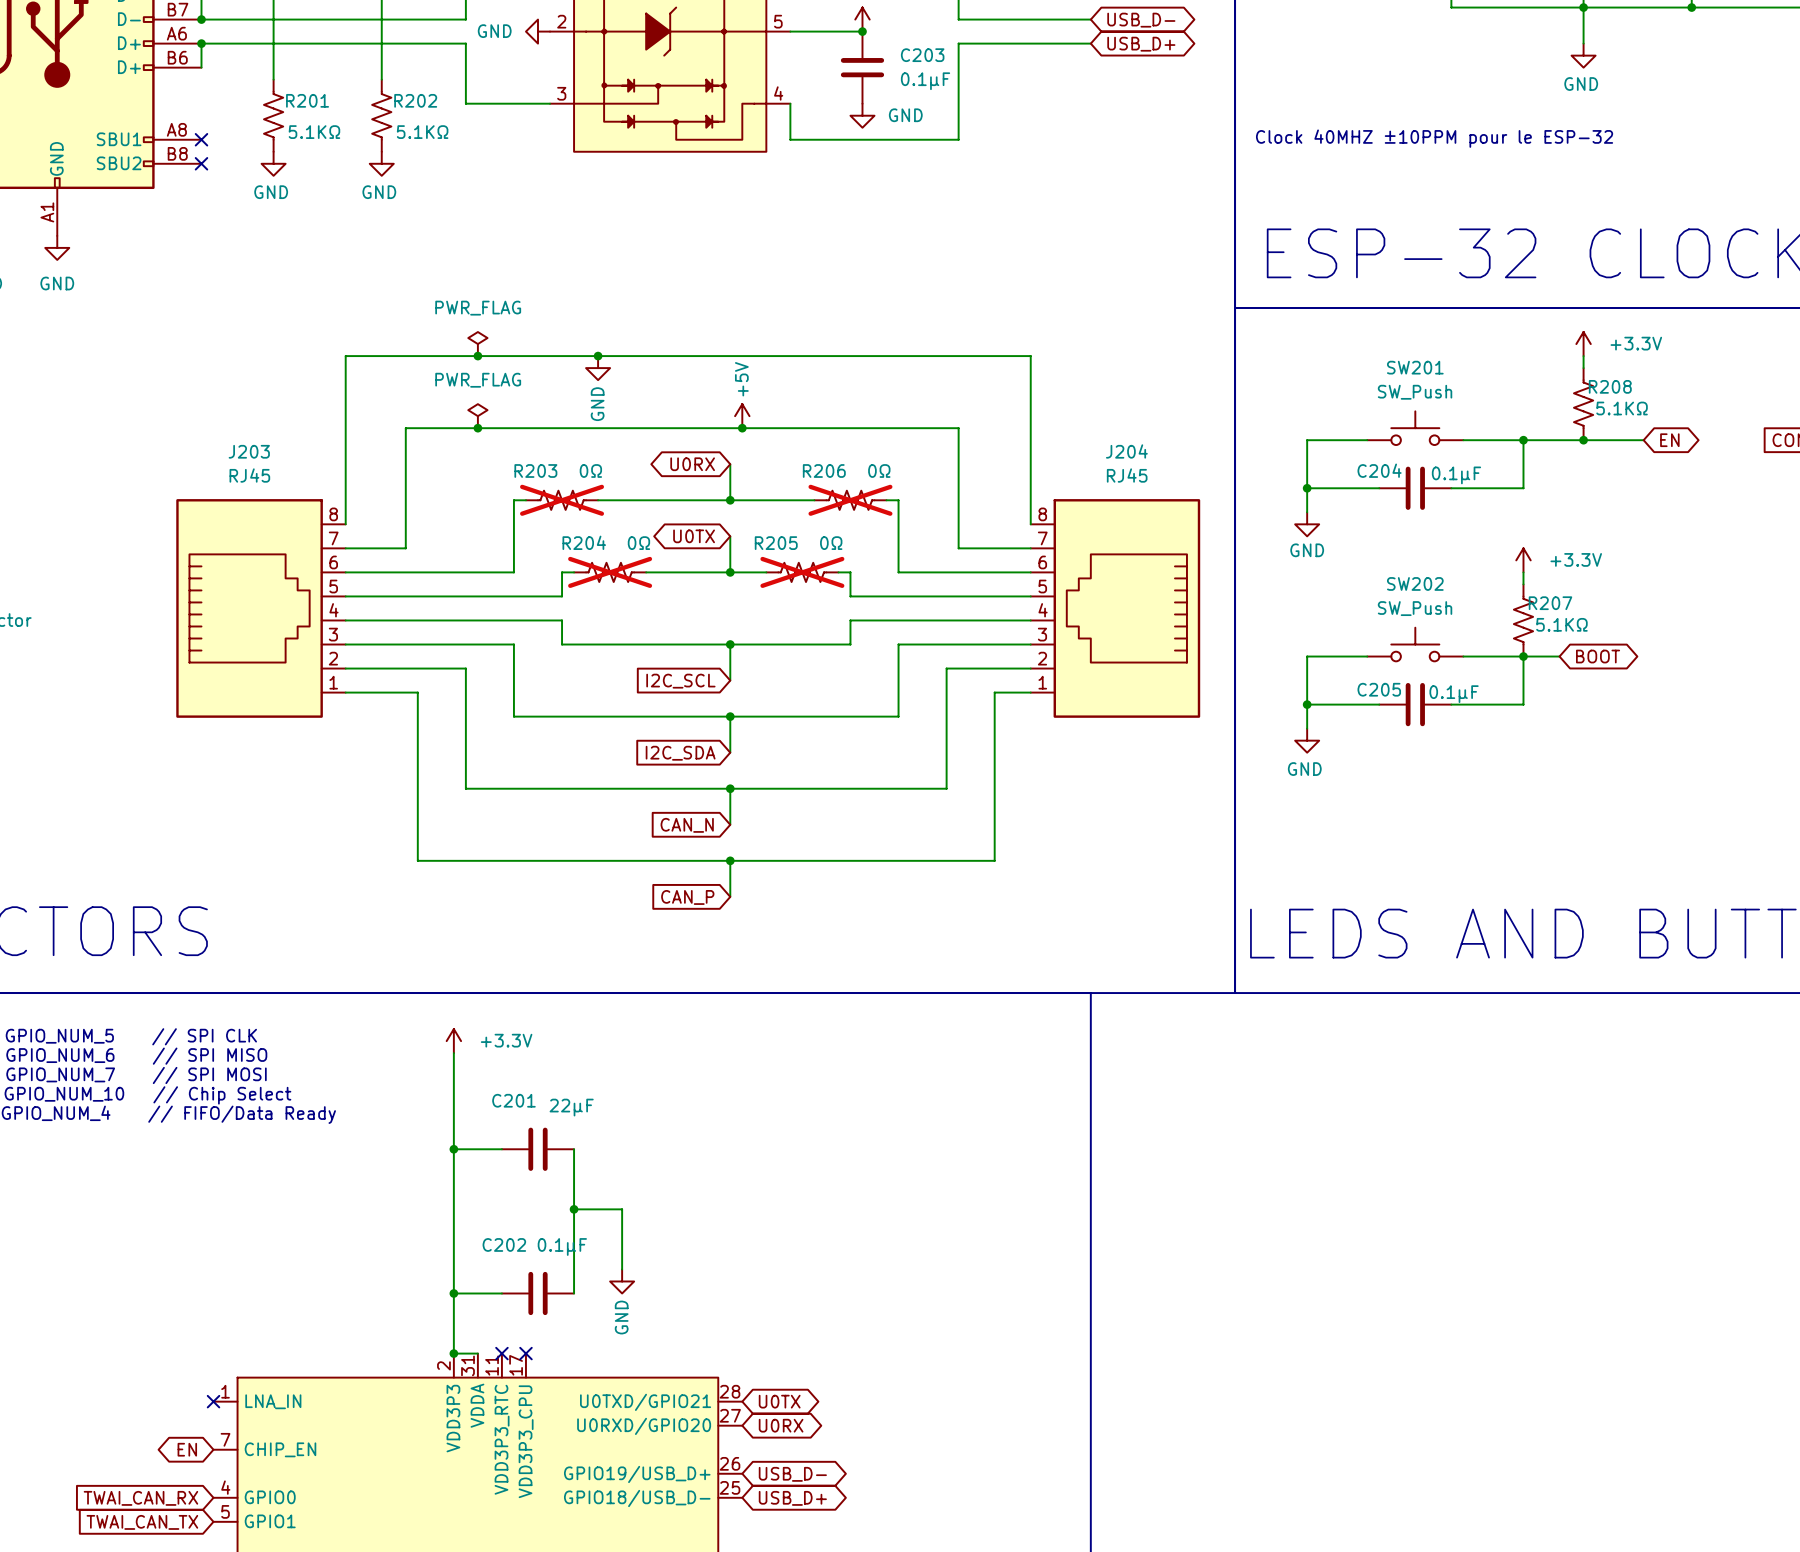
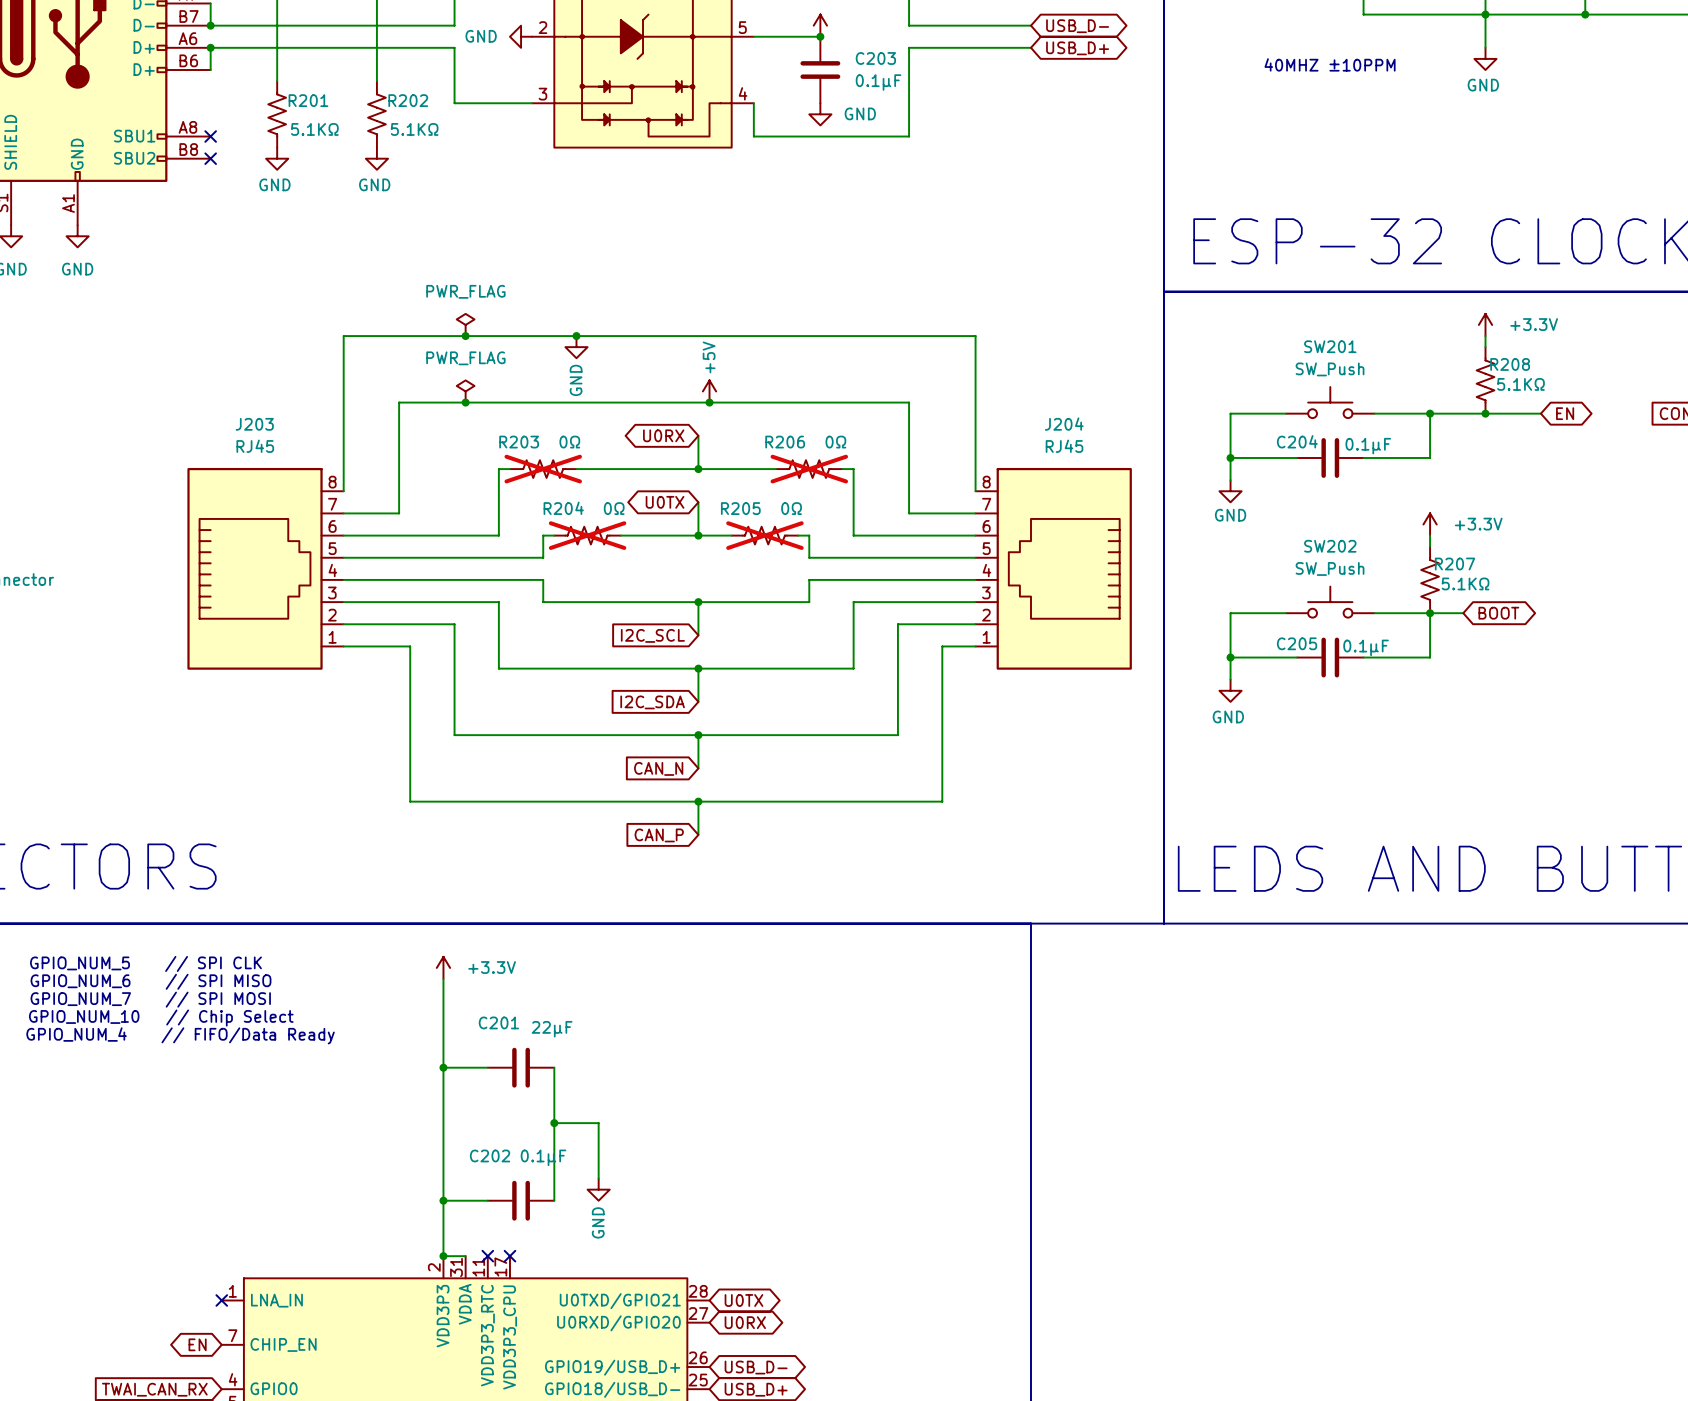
text: none -> 40MHZ ±10PPM (1330, 64)
text: Clock 40MHZ ±10PPM pour le ESP-32 (1434, 138) -> none

